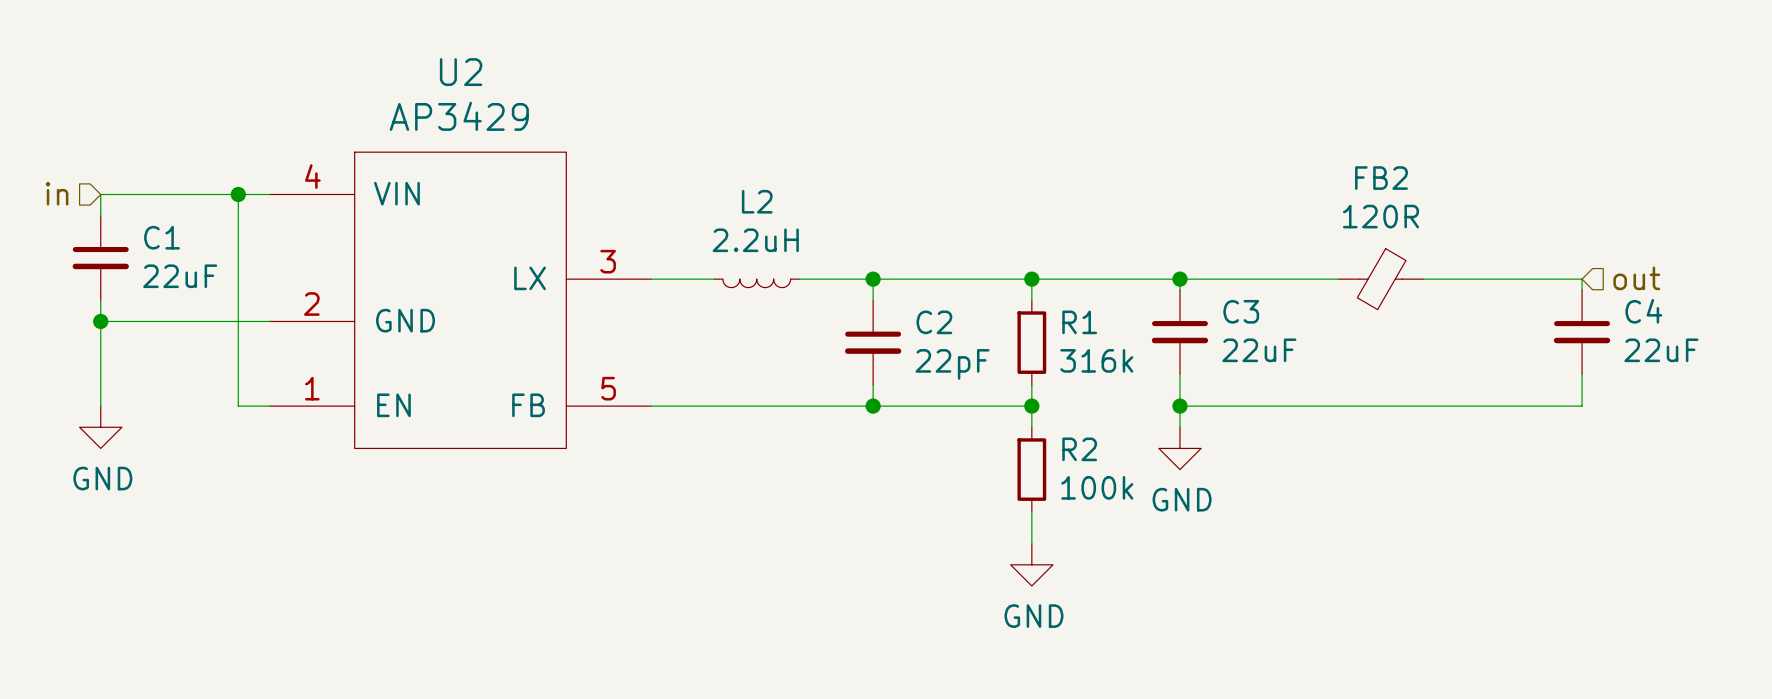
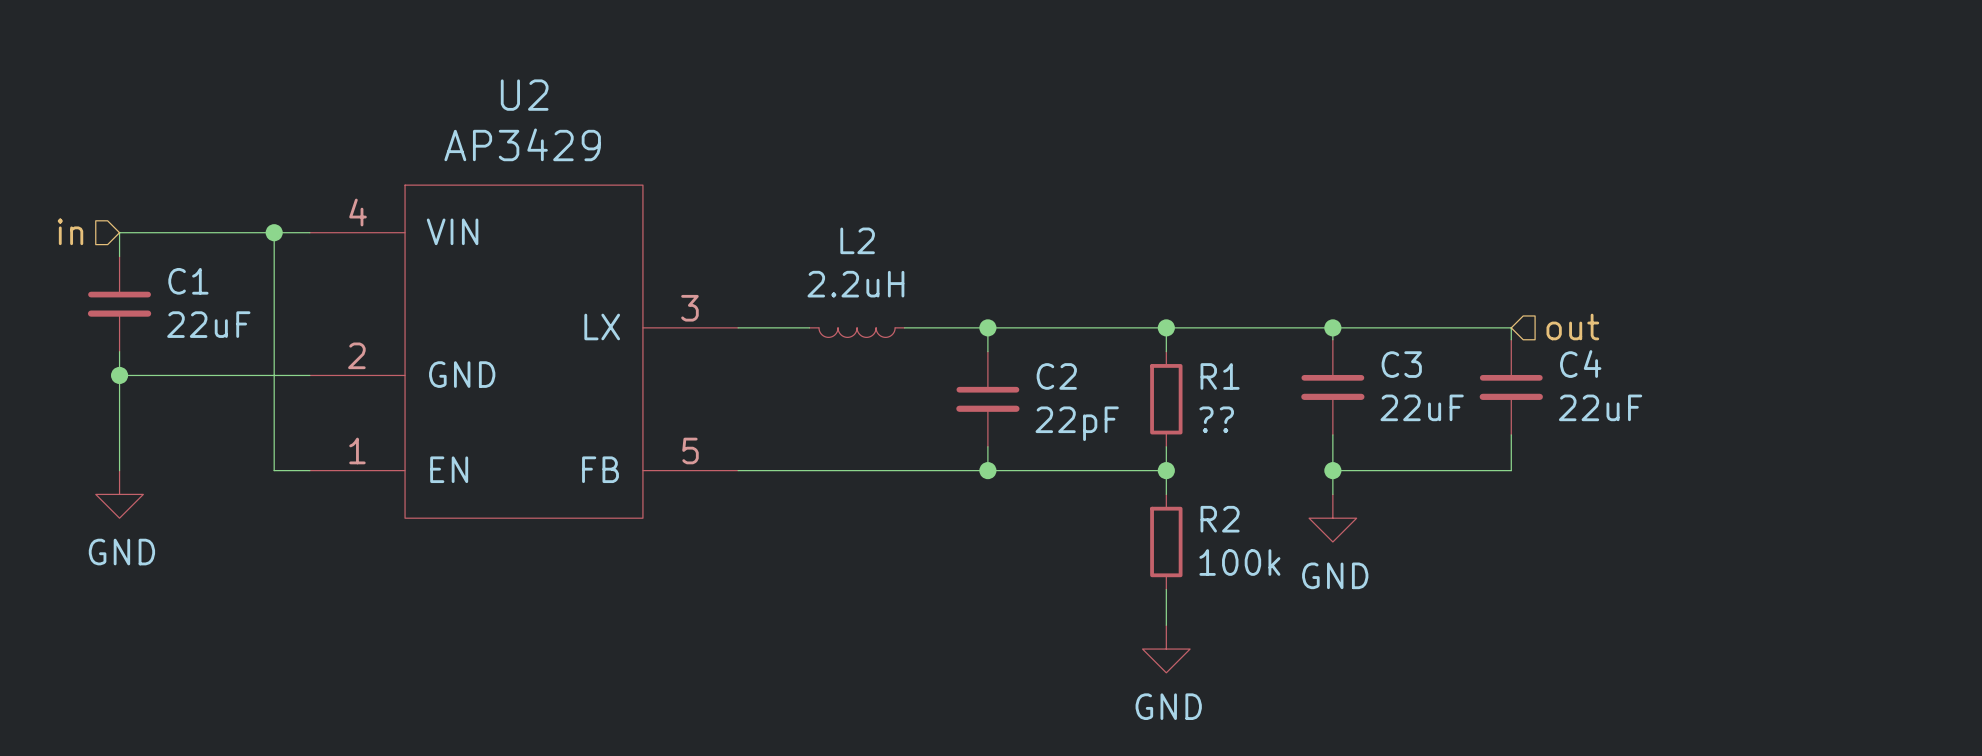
hierarchical label position: out (1636, 278) -> out (1572, 326)
wire: none -> (1511, 327) (1511, 339)
FB2: 120R (1381, 279) -> none
wire: (1423, 279) (1582, 279) (1582, 289) -> none
C4 position: (1582, 332) -> (1511, 387)
R1 value: 316k (1096, 360) -> ?? (1216, 419)
wire: (1582, 374) (1582, 406) (1338, 406) -> (1511, 434) (1511, 470)

